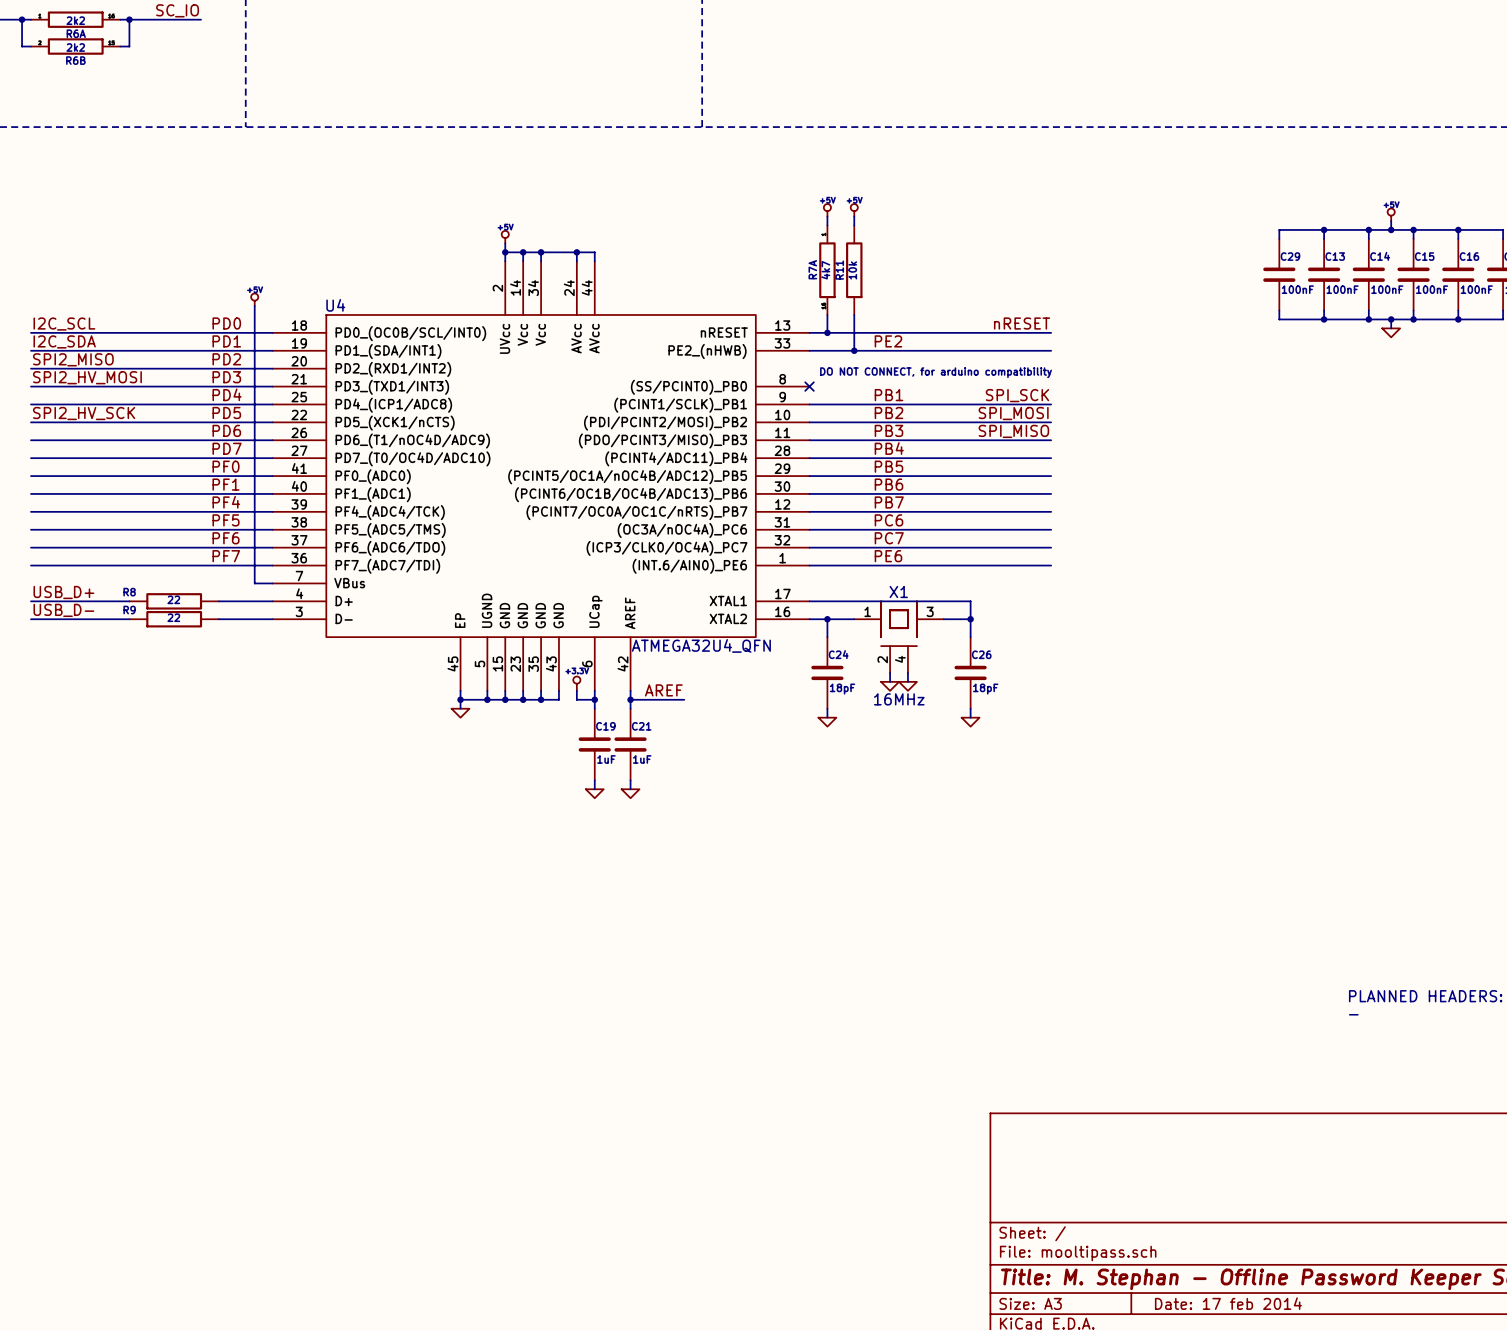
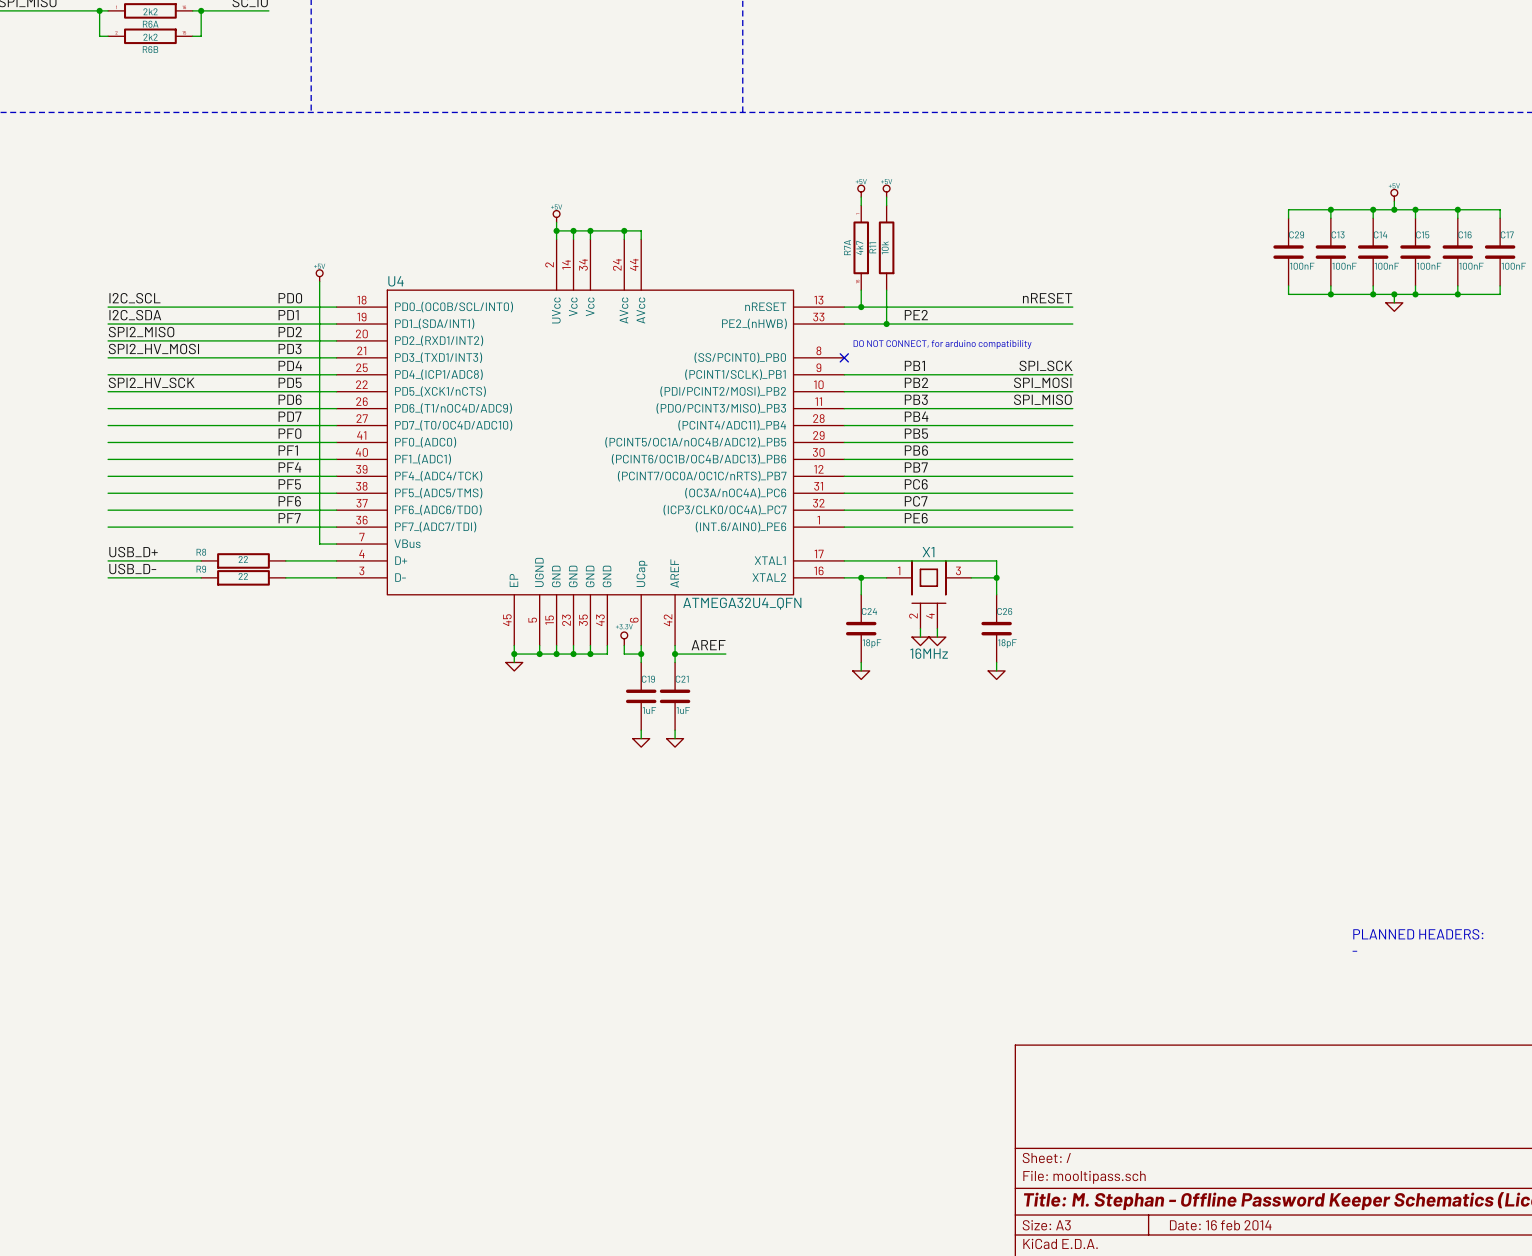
title block: Date: 17 feb 2014 (1228, 1303) -> Date: 16 feb 2014 (1220, 1225)

